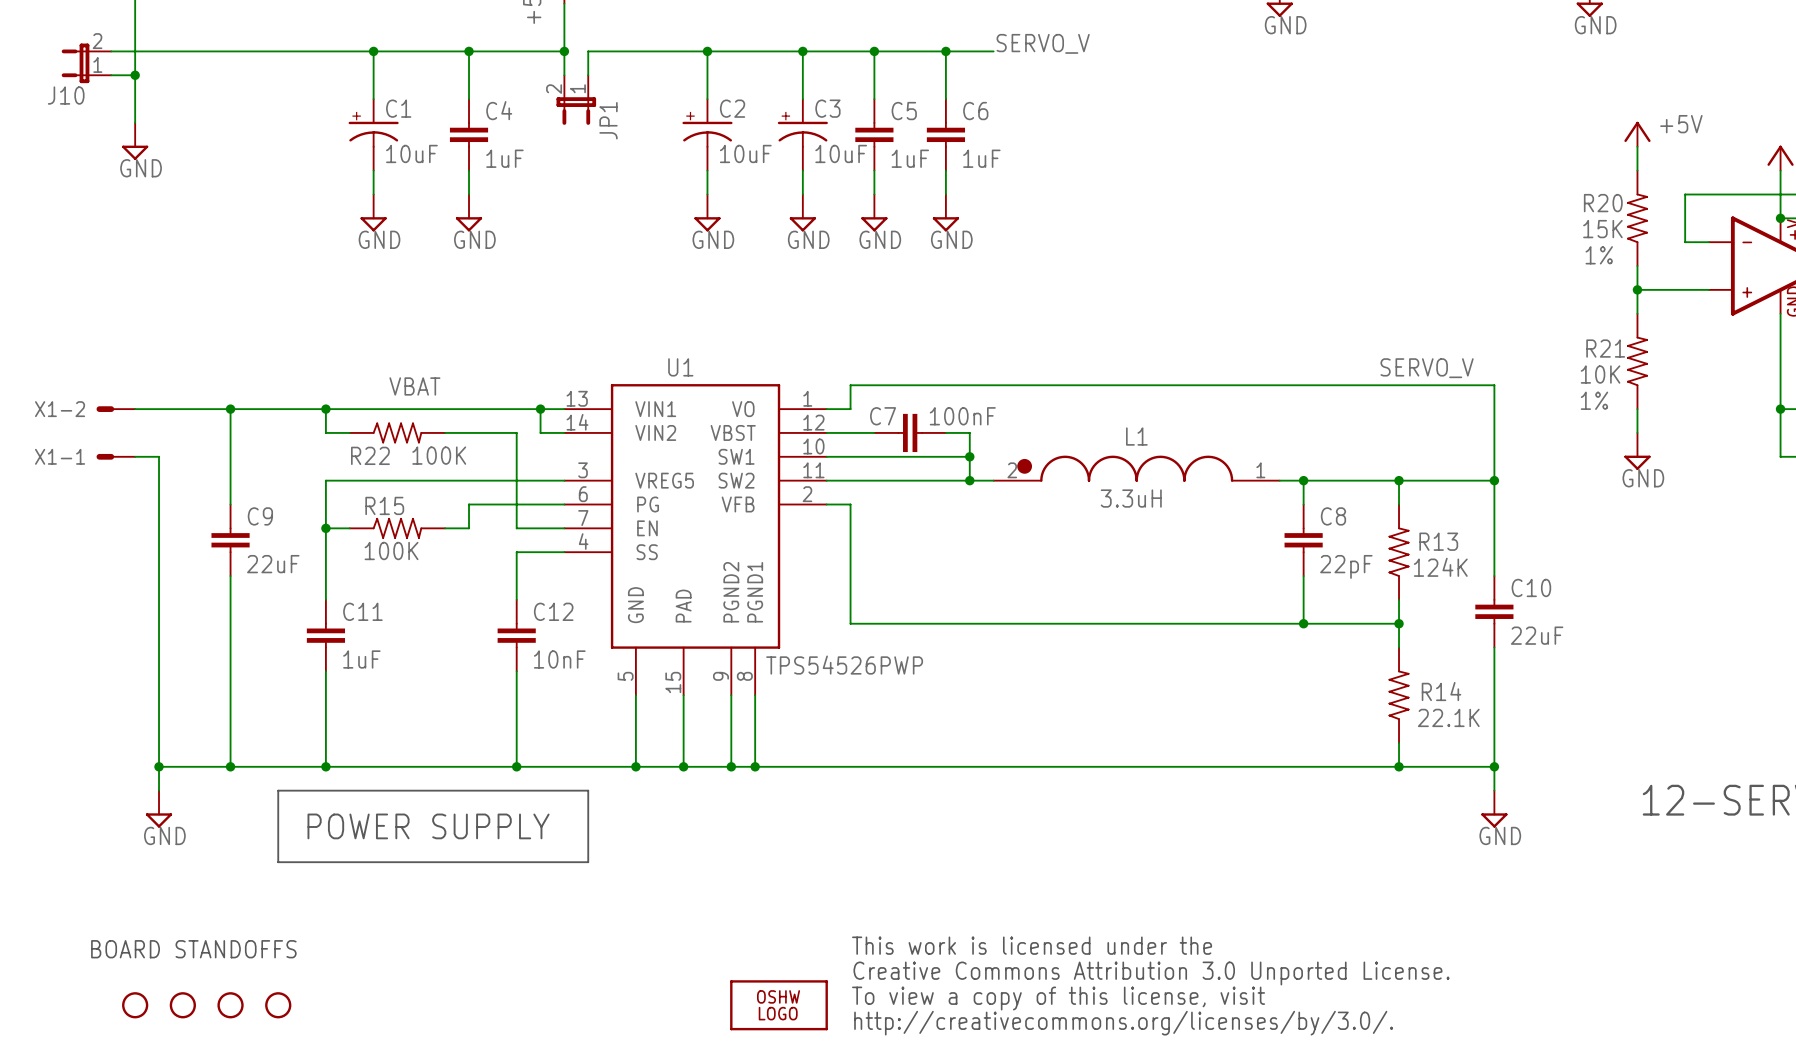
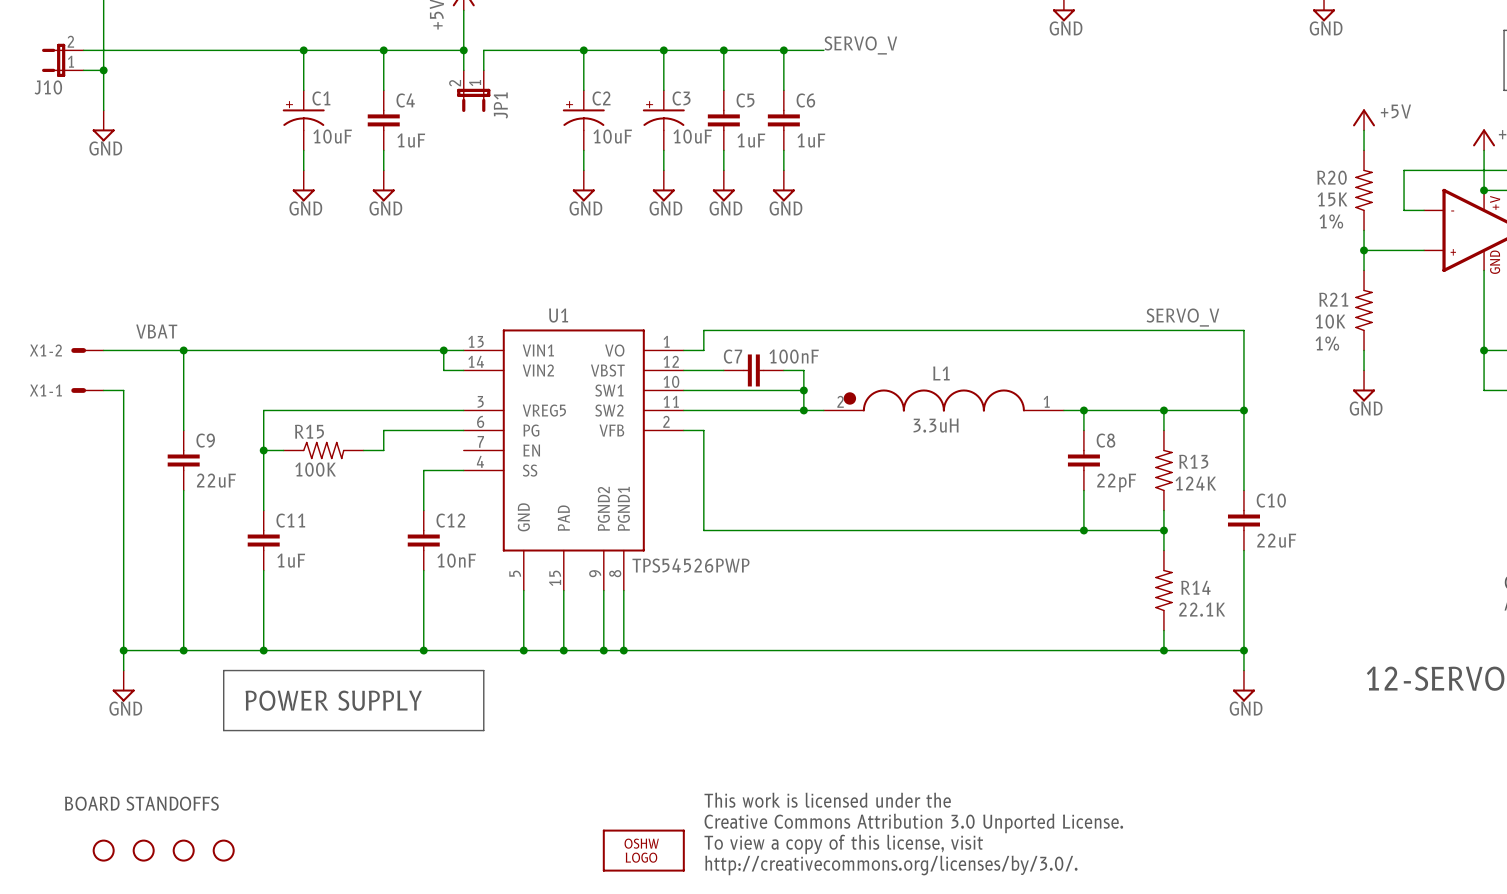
label position: VBAT (414, 386) -> VBAT (156, 331)
wire: (325, 409) (325, 432) (349, 432) -> none
junction: (325, 409) -> none
R22: 100K (397, 432) -> none
wire: (445, 432) (516, 432) (516, 528) (564, 528) -> none

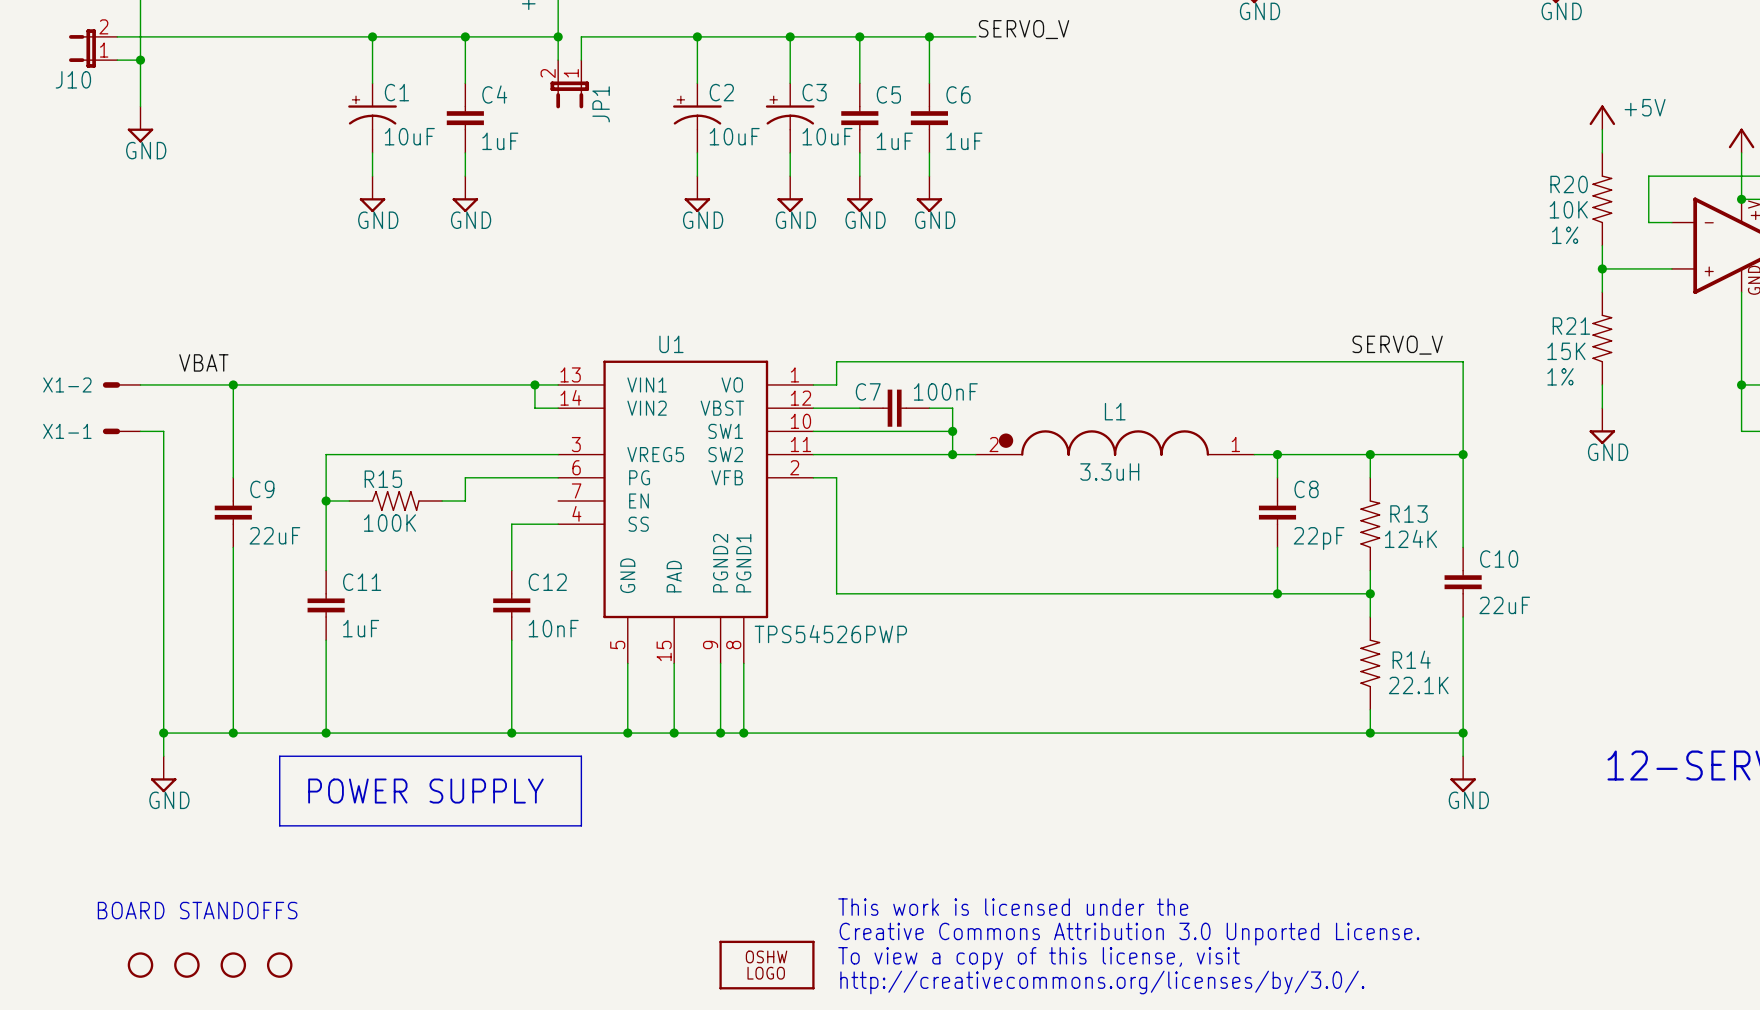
R20 value: 15K (1332, 199) -> 10K (1568, 209)
R21 value: 10K (1330, 321) -> 15K (1566, 351)

